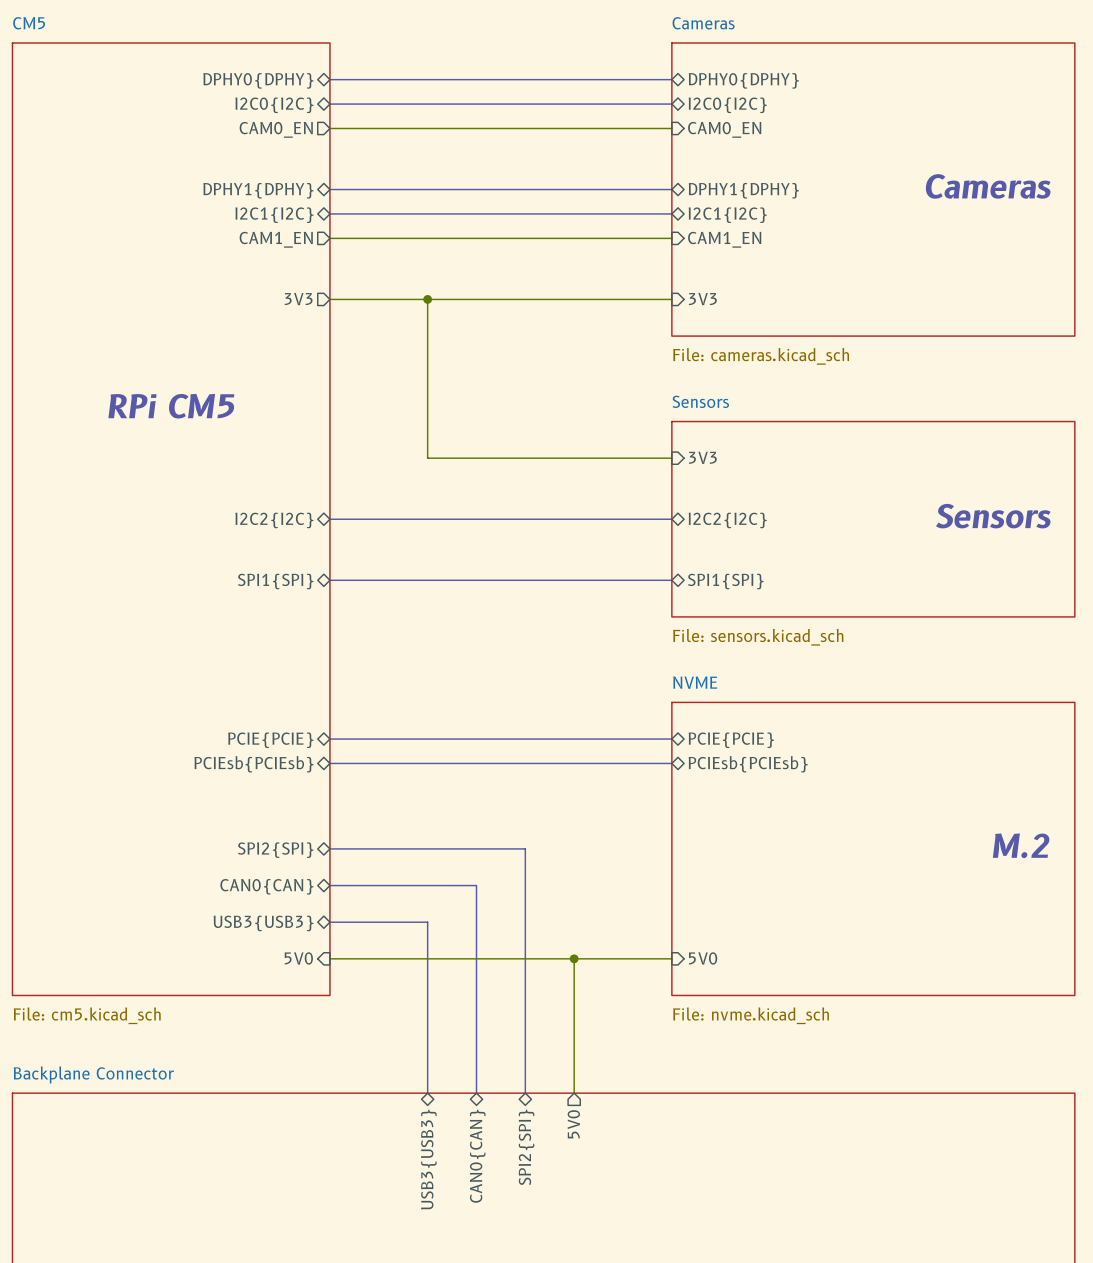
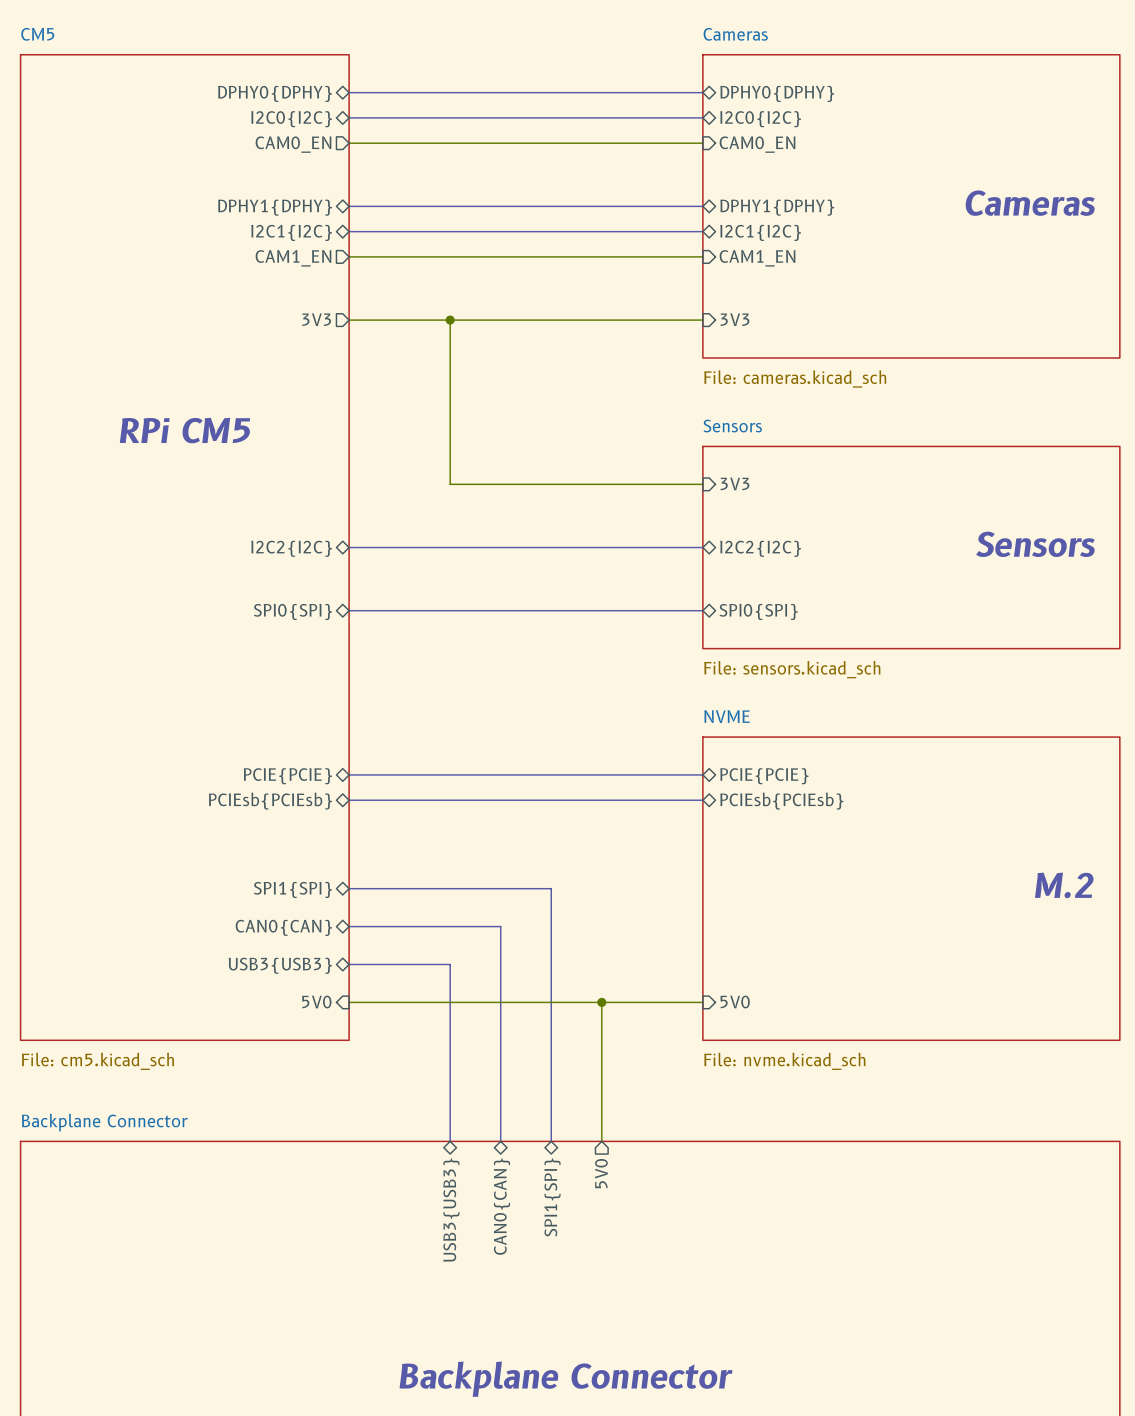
sheet pin: SPI1{SPI} (275, 581) -> SPI0{SPI} (292, 611)
sheet pin: SPI1{SPI} (725, 581) -> SPI0{SPI} (758, 611)
sheet pin: SPI2{SPI} (275, 850) -> SPI1{SPI} (292, 889)
sheet pin: SPI2{SPI} (526, 1147) -> SPI1{SPI} (552, 1197)

